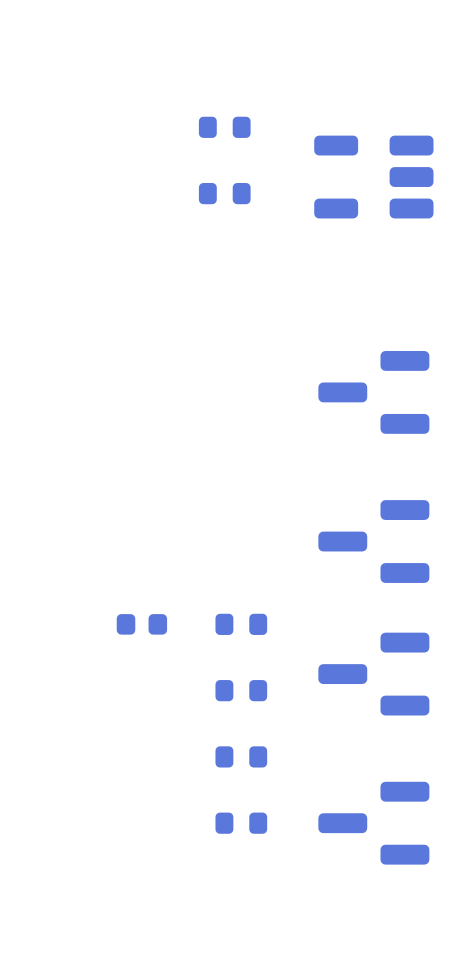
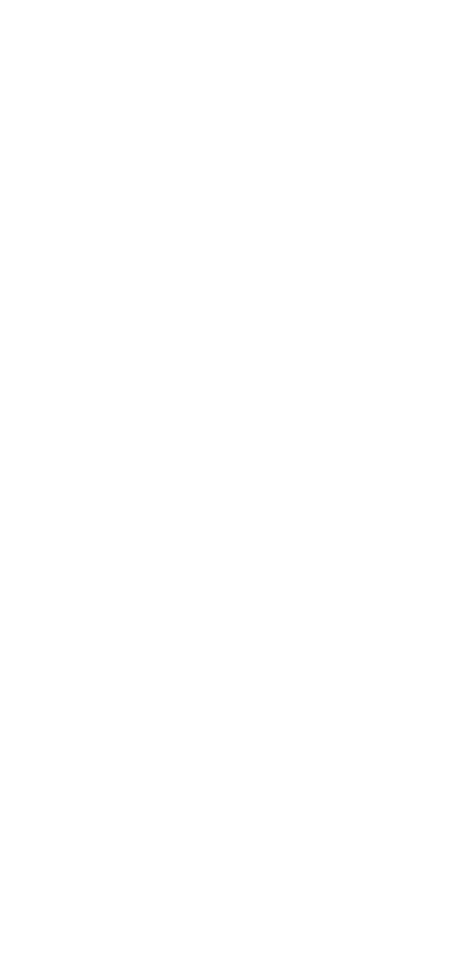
part: (224, 127) -> none
part: (373, 177) -> none
part: (224, 193) -> none
part: (373, 392) -> none
part: (373, 541) -> none
part: (141, 624) -> none
part: (241, 624) -> none
part: (373, 674) -> none
part: (241, 690) -> none
part: (241, 756) -> none
part: (241, 823) -> none
part: (373, 823) -> none

